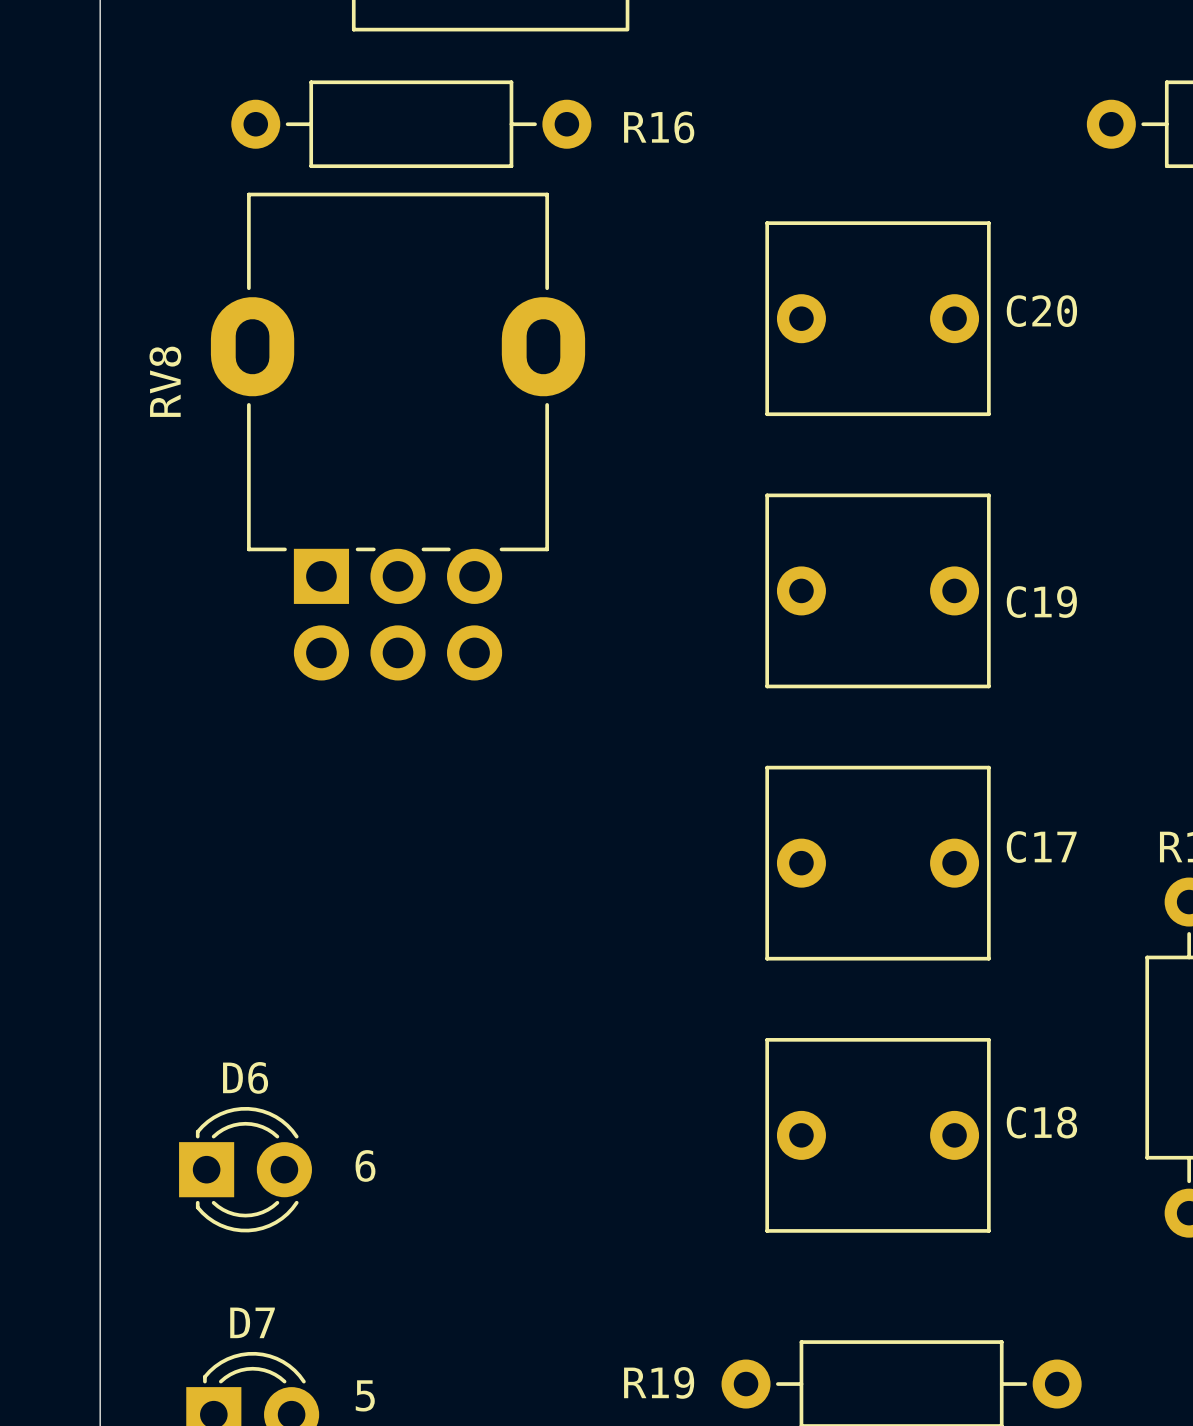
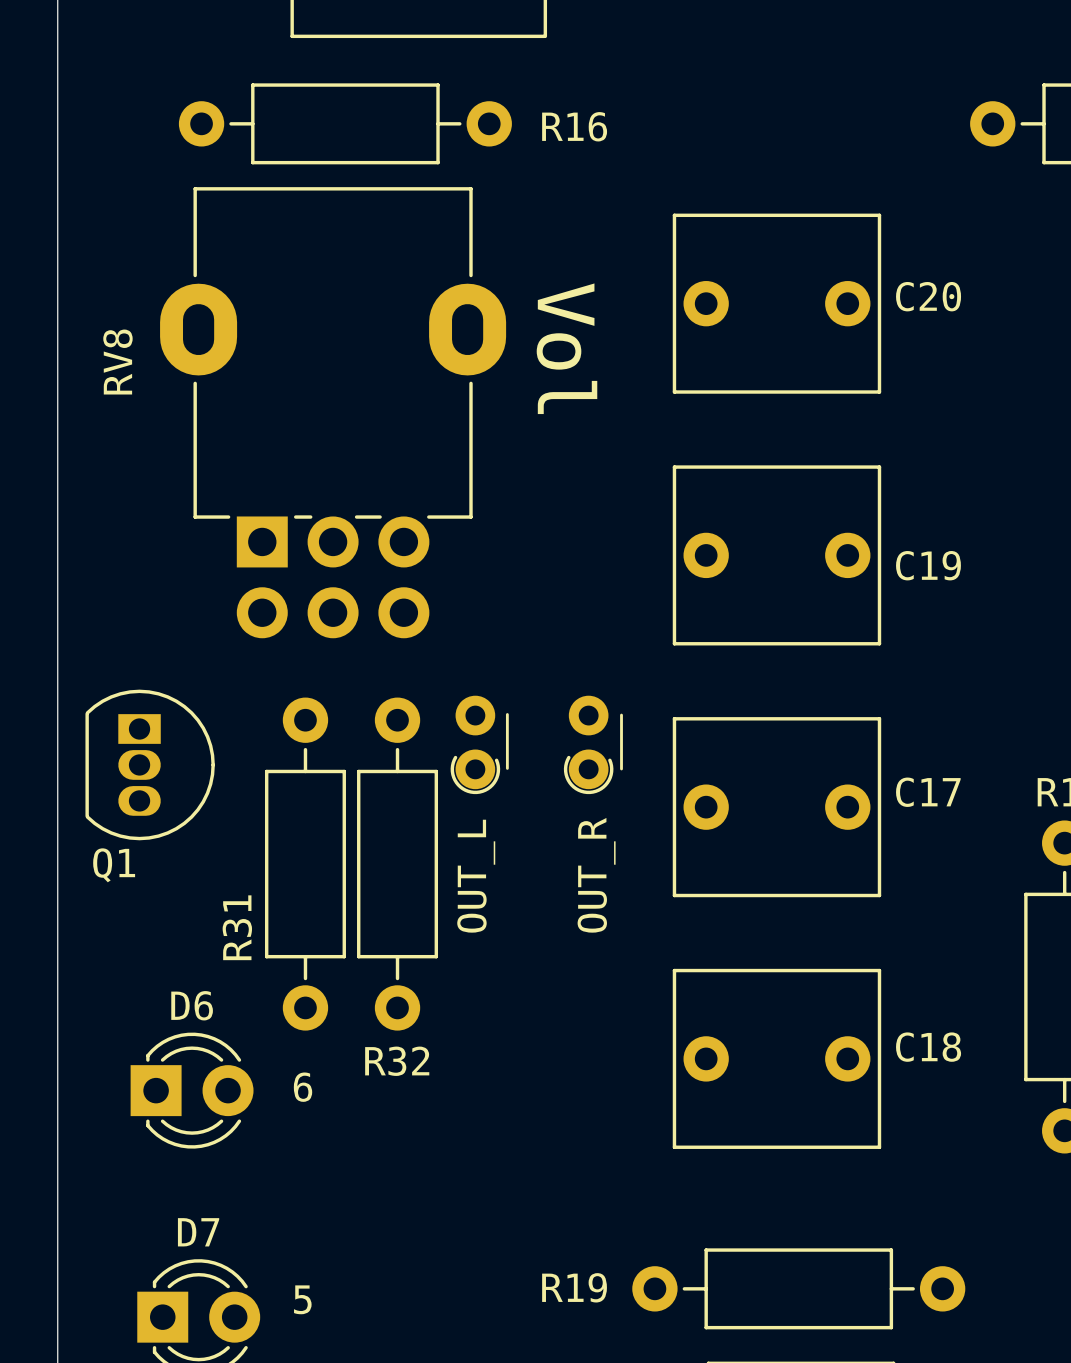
text: none -> Vol (566, 348)
line: none -> (507, 714) (507, 768)
line: none -> (621, 715) (621, 769)
part: none -> (475, 744)
part: none -> (588, 744)
Q1: none -> (150, 764)
R31: none -> (305, 864)
R32: none -> (397, 864)
text: none -> OUT_R (596, 875)
text: none -> OUT_L (476, 876)

